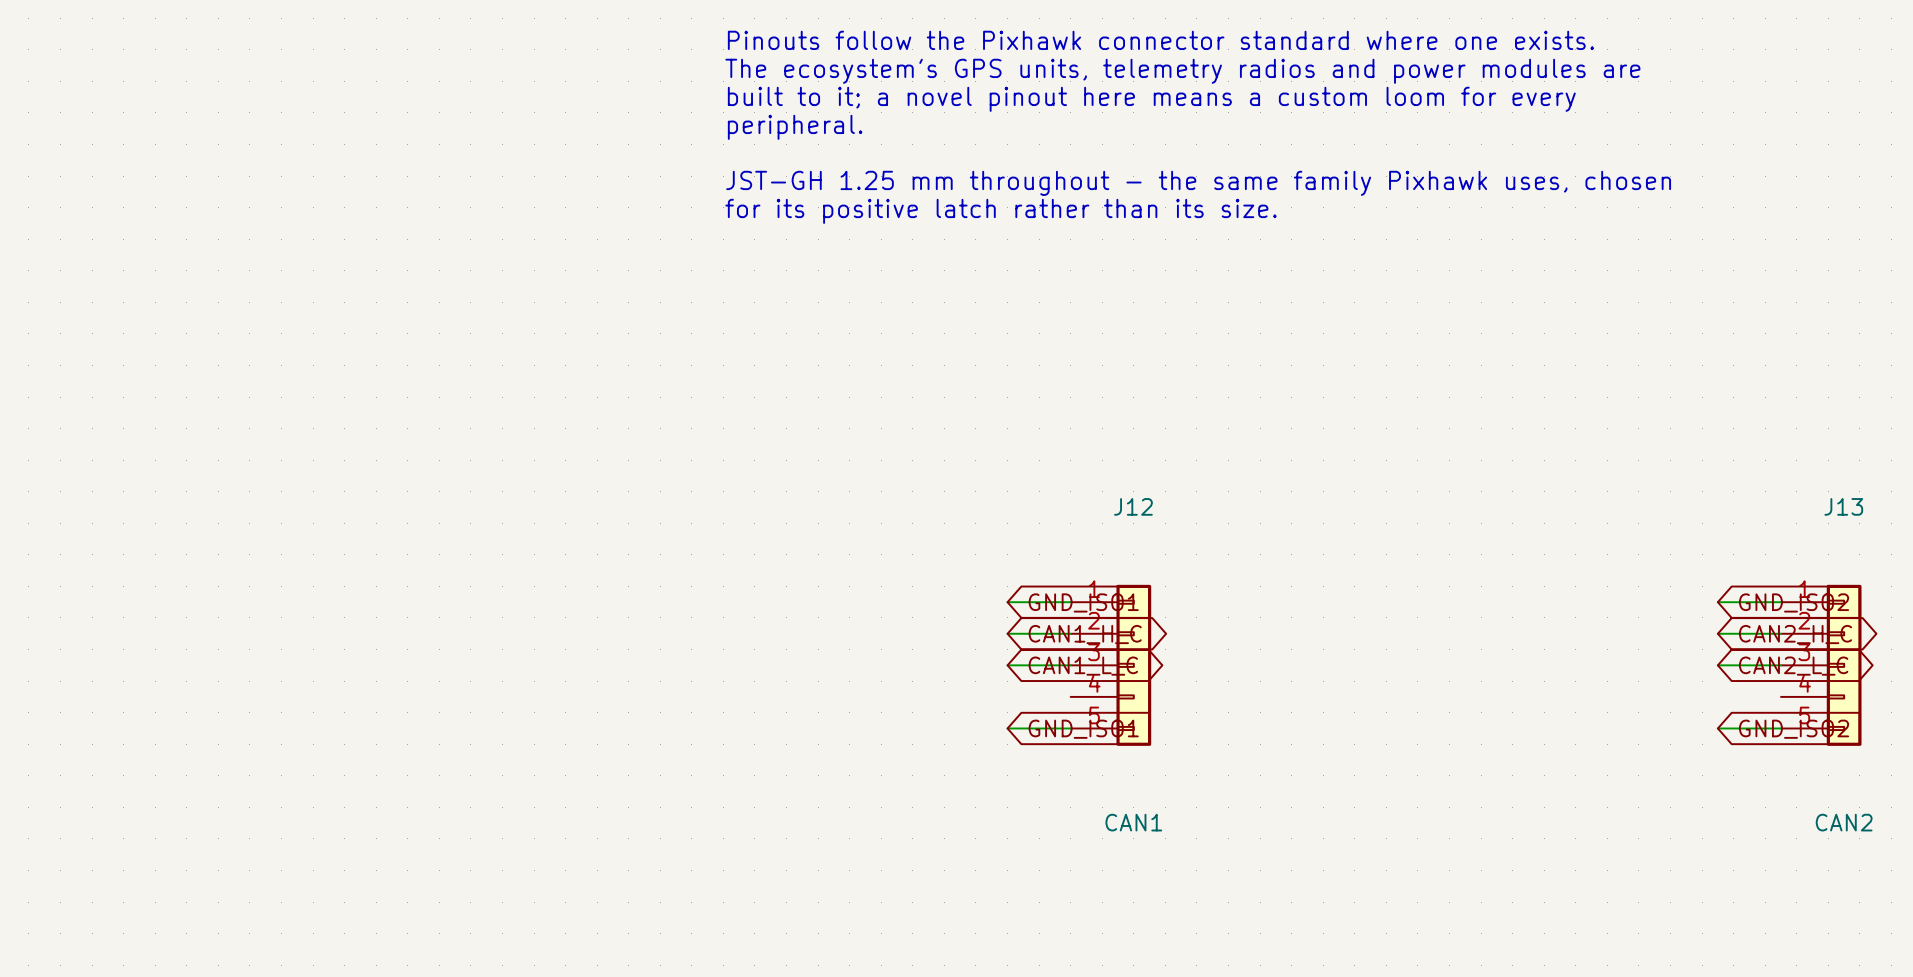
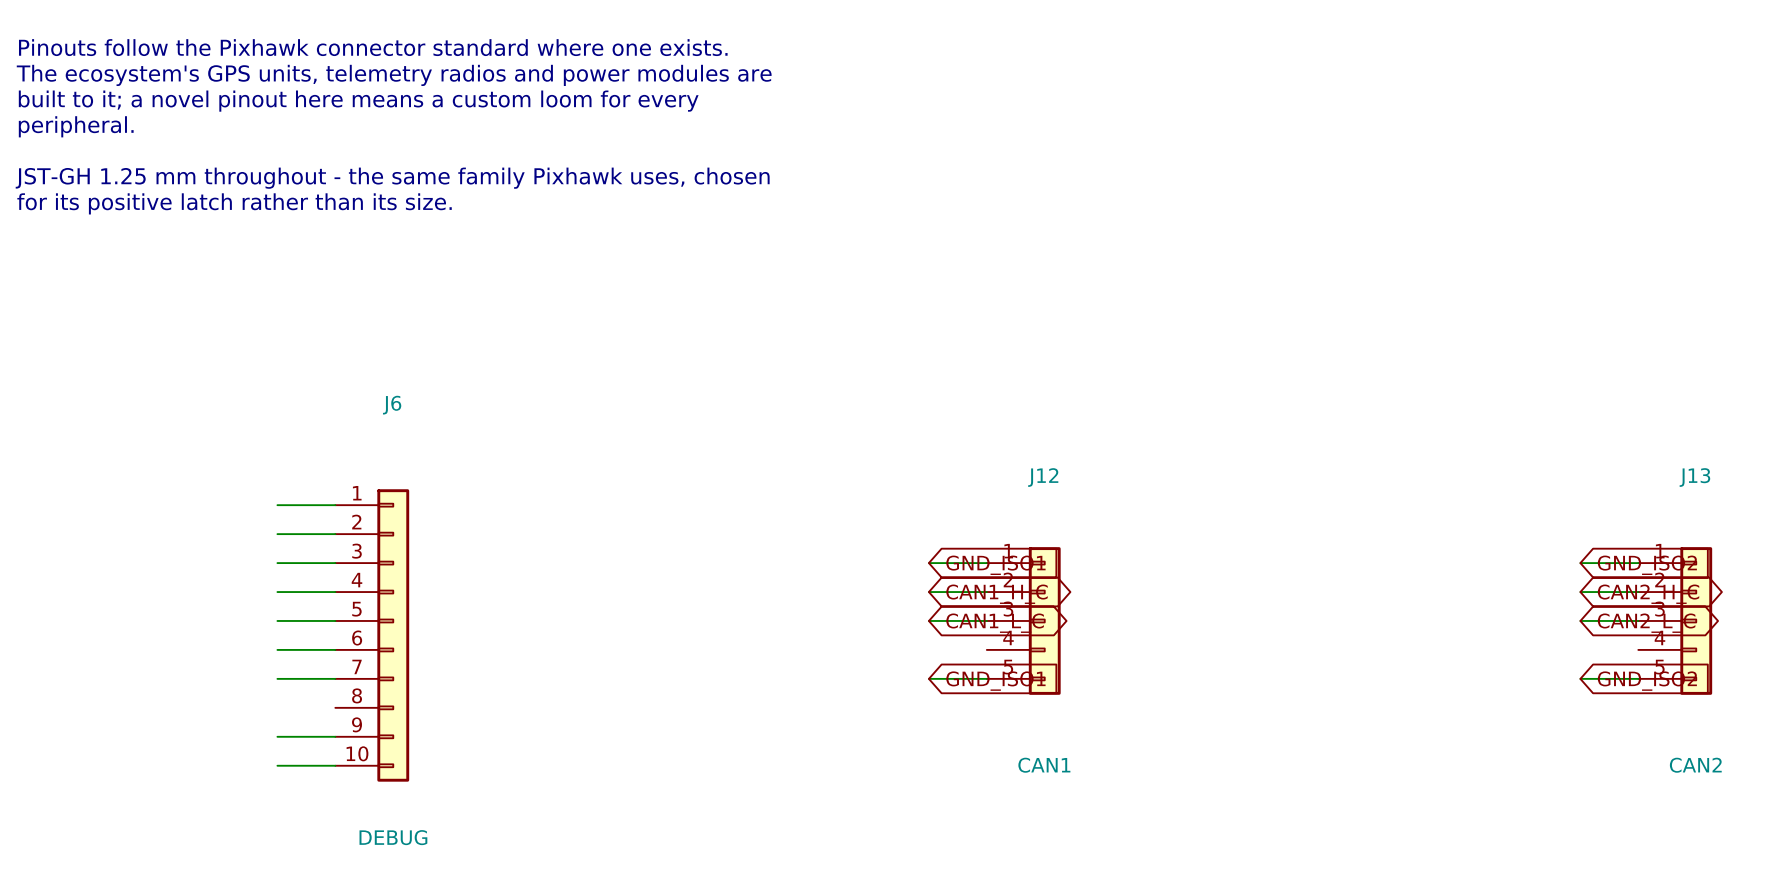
text: none -> Pinouts follow the Pixhawk connector standard where one exists. (373, 47)
text: Pinouts follow the Pixhawk connector standard where one exists. (1160, 40) -> none
text: none -> The ecosystem's GPS units, telemetry radios and power modules are (394, 75)
text: The ecosystem's GPS units, telemetry radios and power modules are (1182, 71) -> none
text: none -> built to it; a novel pinout here means a custom loom for every (358, 101)
text: built to it; a novel pinout here means a custom loom for every (1151, 99) -> none
text: none -> peripheral. (76, 126)
text: peripheral. (795, 127) -> none
text: none -> JST-GH 1.25 mm throughout - the same family Pixhawk uses, chosen (392, 178)
text: JST-GH 1.25 mm throughout - the same family Pixhawk uses, chosen (1198, 183) -> none
text: none -> for its positive latch rather than its size. (234, 203)
text: for its positive latch rather than its size. (1001, 211) -> none
wire: none -> (277, 505) (335, 505)
wire: none -> (277, 534) (335, 534)
wire: none -> (277, 563) (335, 563)
wire: none -> (277, 592) (335, 592)
wire: none -> (277, 620) (335, 620)
J6: none -> DEBUG (372, 635)
wire: none -> (277, 649) (335, 649)
wire: none -> (277, 678) (335, 678)
wire: none -> (277, 736) (335, 736)
wire: none -> (277, 765) (335, 765)

